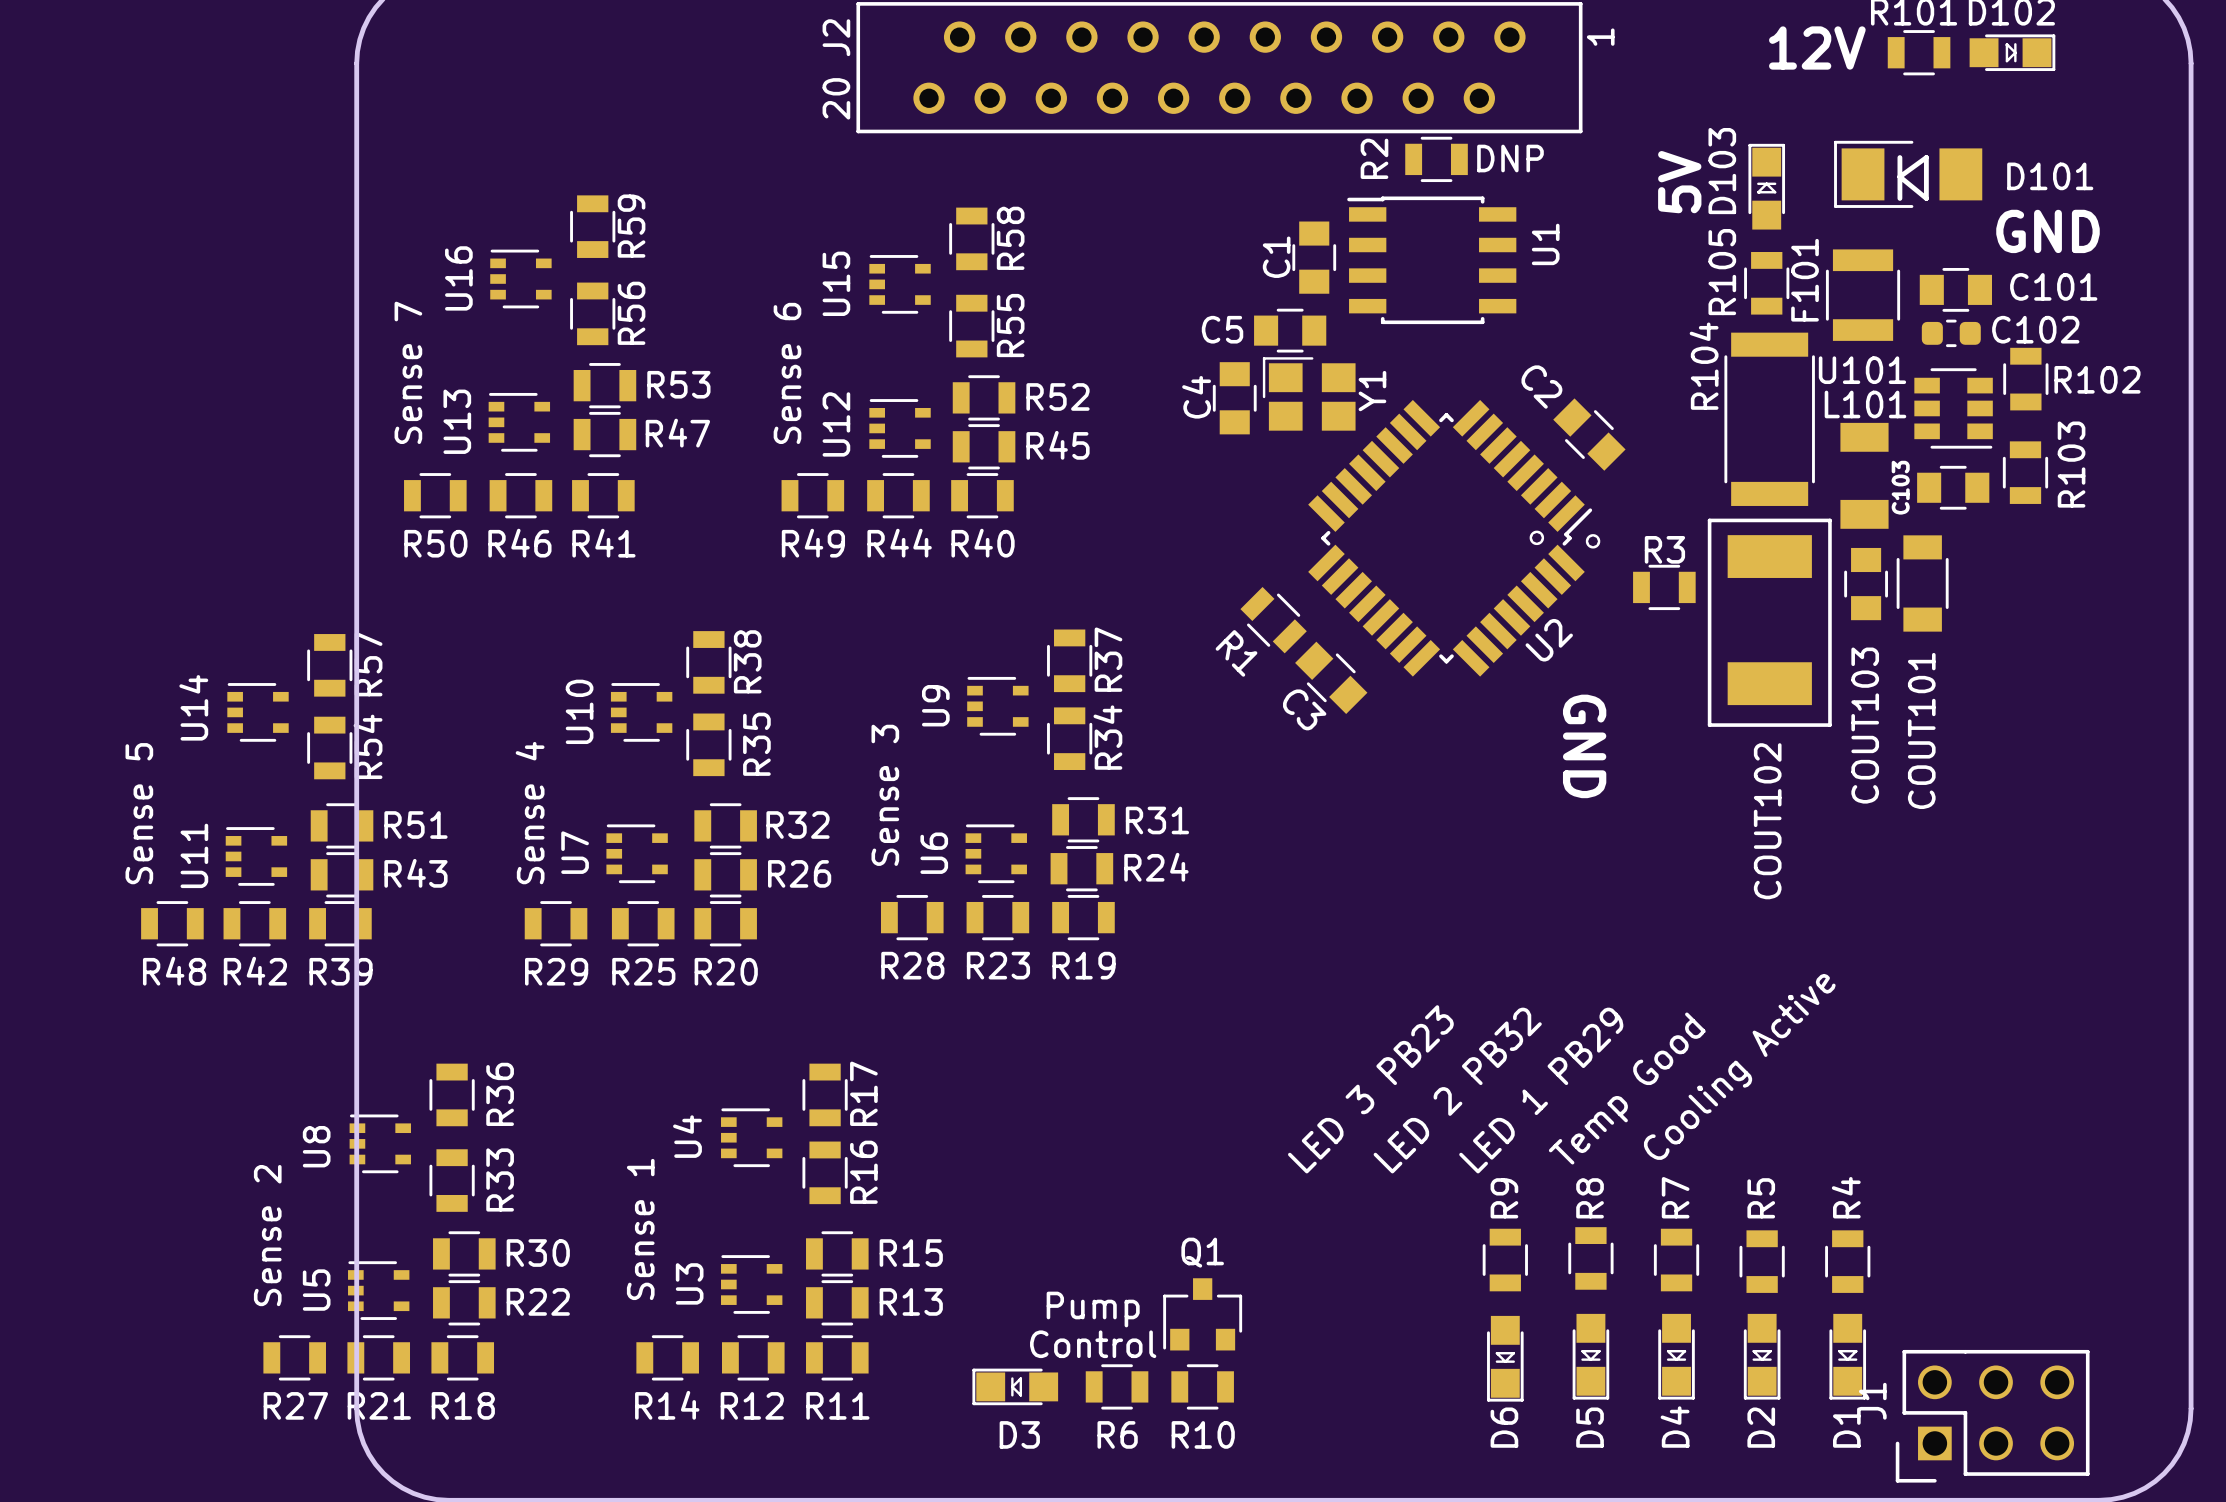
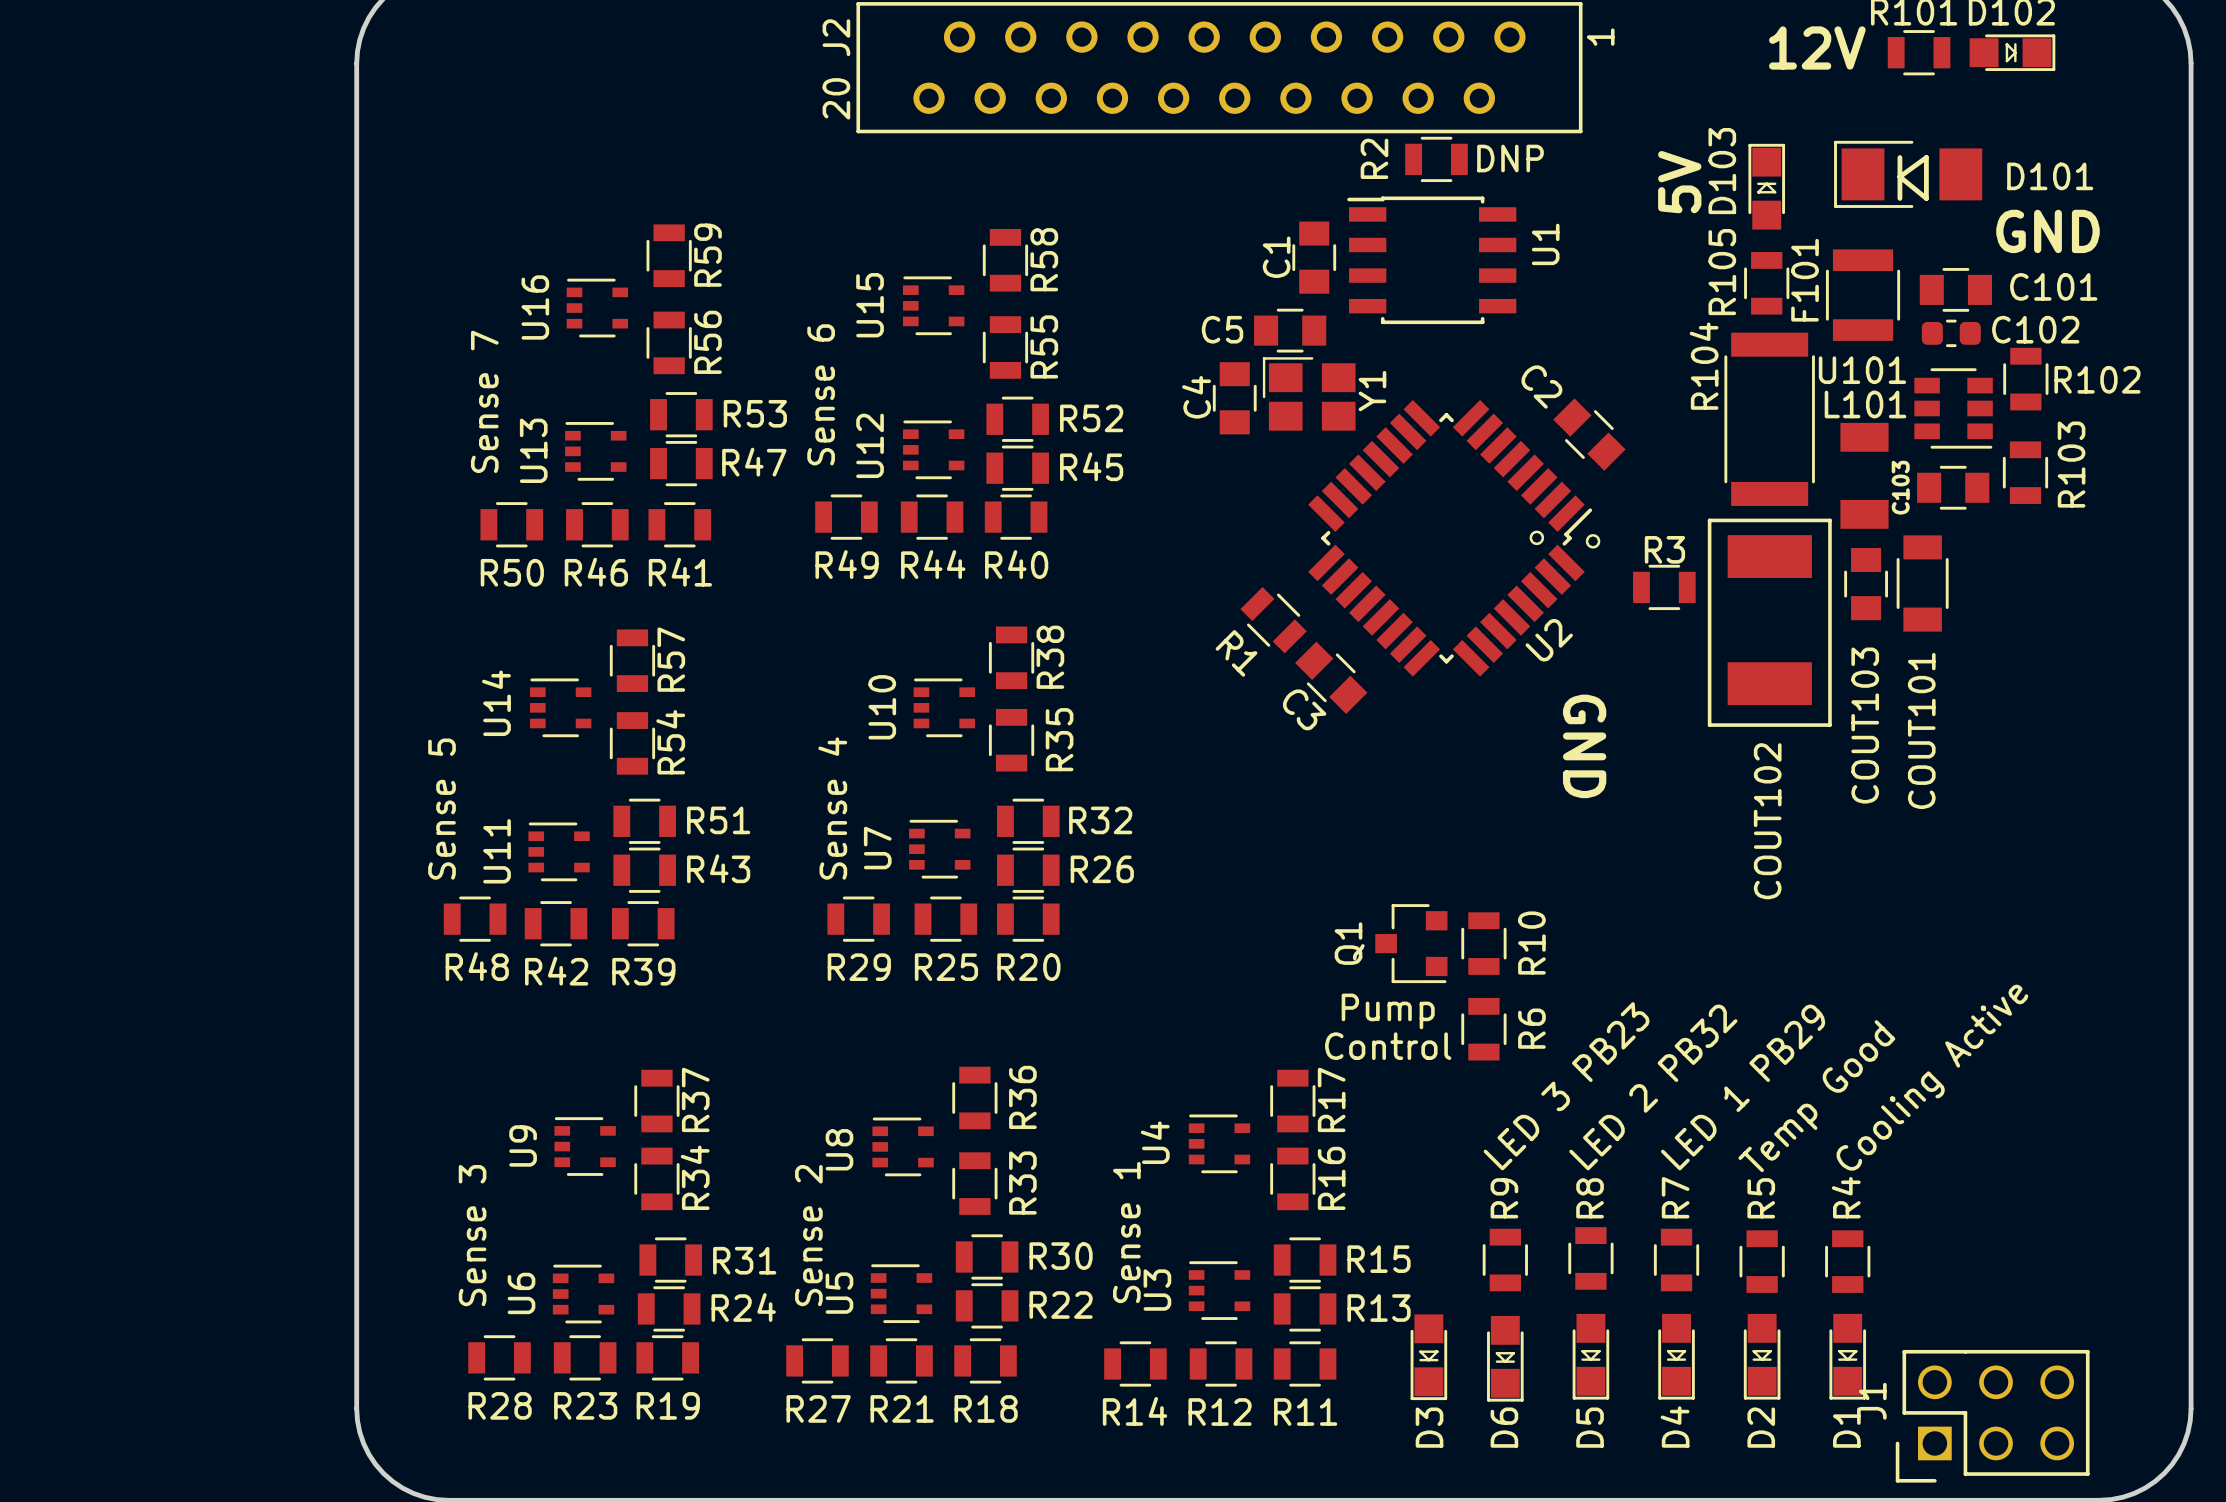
R59 position: (592, 226) -> (669, 255)
R58 position: (971, 238) -> (1005, 260)
U16 position: (520, 279) -> (597, 308)
U15 position: (900, 284) -> (933, 305)
R56 position: (592, 313) -> (669, 342)
R55 position: (971, 326) -> (1005, 347)
text position: Sense 7 (408, 372) -> Sense 7 (484, 401)
text position: Sense 6 (787, 373) -> Sense 6 (821, 394)
R53 position: (604, 385) -> (681, 414)
R52 position: (984, 397) -> (1017, 419)
U13 position: (519, 422) -> (595, 451)
U12 position: (900, 428) -> (933, 449)
R47 position: (604, 434) -> (681, 463)
R45 position: (984, 446) -> (1017, 468)
R50 position: (435, 495) -> (511, 524)
R46 position: (520, 495) -> (597, 524)
R41 position: (603, 495) -> (679, 524)
R49 position: (812, 495) -> (846, 517)
R44 position: (898, 495) -> (932, 517)
R40 position: (982, 495) -> (1016, 517)
R37 position: (1069, 660) -> (656, 1101)
R38 position: (708, 662) -> (1011, 657)
R57 position: (329, 665) -> (632, 660)
U9 position: (997, 706) -> (585, 1146)
U14 position: (258, 712) -> (560, 707)
U10 position: (641, 712) -> (944, 707)
R34 position: (1069, 738) -> (656, 1178)
R35 position: (708, 744) -> (1011, 740)
R54 position: (329, 748) -> (632, 743)
text: Sense 3 (885, 795) -> none
text position: Sense 5 (139, 813) -> Sense 5 (442, 809)
text position: Sense 4 (530, 813) -> Sense 4 (832, 808)
R31 position: (1083, 819) -> (670, 1260)
R51 position: (342, 825) -> (644, 821)
R32 position: (725, 825) -> (1028, 821)
U7 position: (637, 853) -> (939, 849)
U6 position: (996, 853) -> (583, 1294)
U11 position: (256, 856) -> (559, 851)
R24 position: (1081, 868) -> (669, 1308)
R43 position: (342, 874) -> (644, 870)
R26 position: (725, 874) -> (1028, 870)
R28 position: (912, 917) -> (499, 1357)
R23 position: (997, 917) -> (585, 1357)
R19: (1083, 917) -> none
R29: none -> (858, 919)
R25: none -> (945, 919)
R48 position: (172, 923) -> (475, 919)
R42: (254, 923) -> none
R39: (340, 923) -> none
R20 position: (725, 923) -> (1028, 919)
R29 name: R29 (556, 971) -> R42 (556, 971)
R25 name: R25 (643, 971) -> R39 (643, 971)
text position: Cooling Active (1739, 1066) -> Cooling Active (1932, 1077)
text position: Temp Good (1627, 1088) -> Temp Good (1816, 1096)
text position: LED 3 PB23 (1370, 1089) -> LED 3 PB23 (1566, 1086)
text position: LED 2 PB32 (1457, 1090) -> LED 2 PB32 (1653, 1087)
text position: LED 1 PB29 (1541, 1090) -> LED 1 PB29 (1743, 1087)
R36 position: (452, 1094) -> (974, 1098)
R17 position: (825, 1094) -> (1292, 1101)
U4 position: (751, 1137) -> (1219, 1143)
U8 position: (380, 1143) -> (903, 1146)
R16 position: (825, 1172) -> (1292, 1178)
R33 position: (452, 1180) -> (974, 1183)
text position: Sense 1 (640, 1229) -> Sense 1 (1126, 1232)
text position: Sense 2 (267, 1235) -> Sense 2 (808, 1235)
text: none -> Sense 3 (472, 1235)
R30 position: (464, 1253) -> (987, 1256)
R15 position: (837, 1253) -> (1305, 1260)
U3 position: (751, 1284) -> (1219, 1290)
U5 position: (378, 1290) -> (901, 1293)
R22 position: (464, 1302) -> (987, 1305)
R13 position: (837, 1302) -> (1305, 1308)
text position: Pump (1093, 1309) -> Pump (1388, 1011)
Q1 rotation: 0° (1202, 1314) -> 90° counterclockwise (1411, 943)
Q1 position: (1202, 1314) -> (1411, 943)
text position: Control (1093, 1344) -> Control (1388, 1046)
R27 position: (294, 1357) -> (817, 1360)
R21 position: (378, 1357) -> (901, 1360)
R18 position: (462, 1357) -> (985, 1360)
R12 position: (753, 1357) -> (1221, 1363)
R11 position: (837, 1357) -> (1305, 1363)
R14: none -> (1135, 1363)
D3 rotation: 0° (1015, 1386) -> 90° counterclockwise (1428, 1357)
D3 position: (1015, 1386) -> (1428, 1357)
R6 rotation: 0° (1117, 1386) -> 90° clockwise (1483, 1029)
R6 position: (1117, 1386) -> (1483, 1029)
R10 rotation: 0° (1202, 1386) -> 90° clockwise (1483, 943)
R10 position: (1202, 1386) -> (1483, 943)
R14 name: R14 (667, 1405) -> R19 (668, 1405)
R6 name position: R6 (1117, 1434) -> R6 (1531, 1028)
R10 name position: R10 (1203, 1434) -> R10 (1531, 943)

